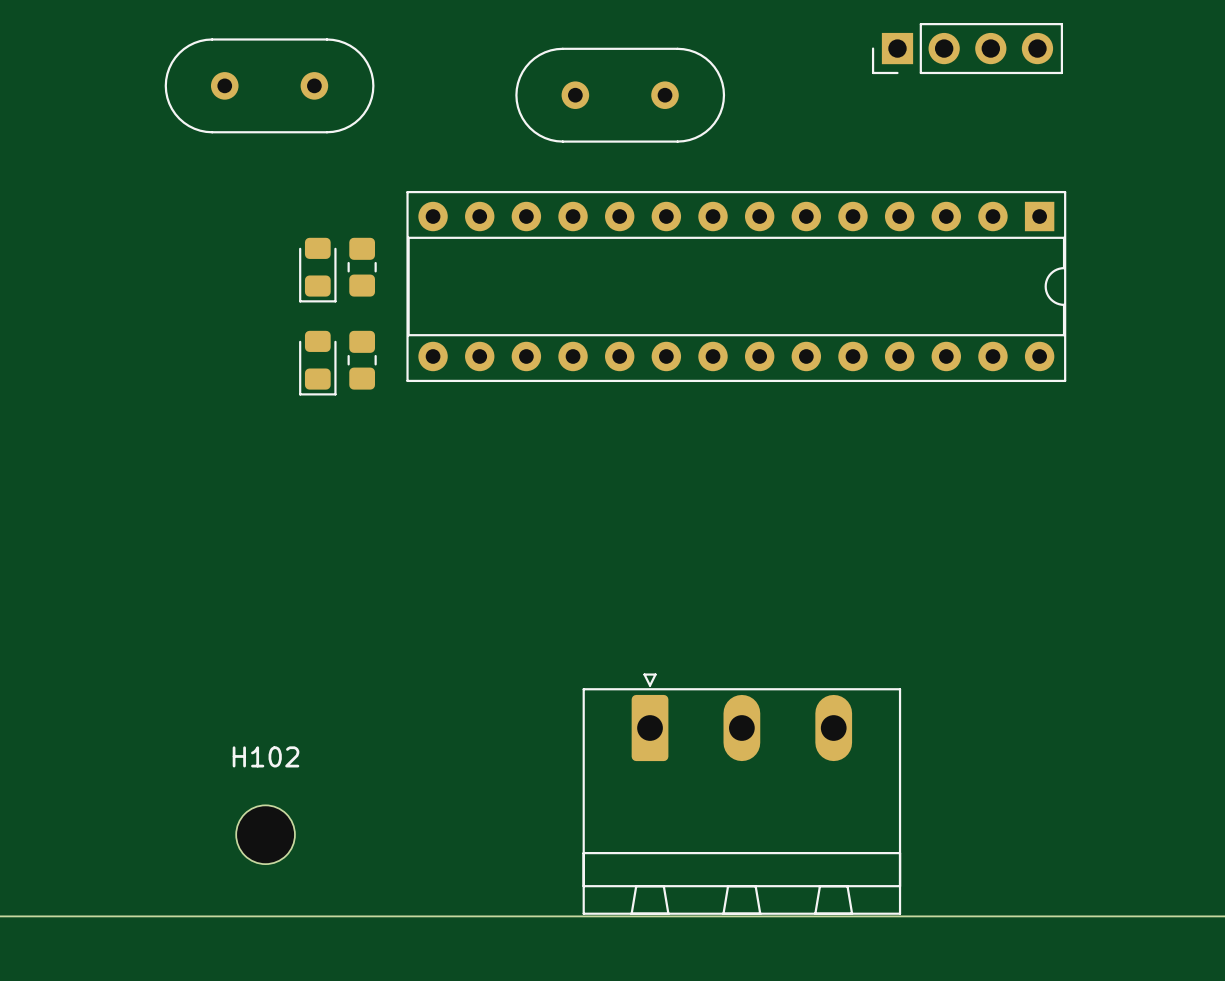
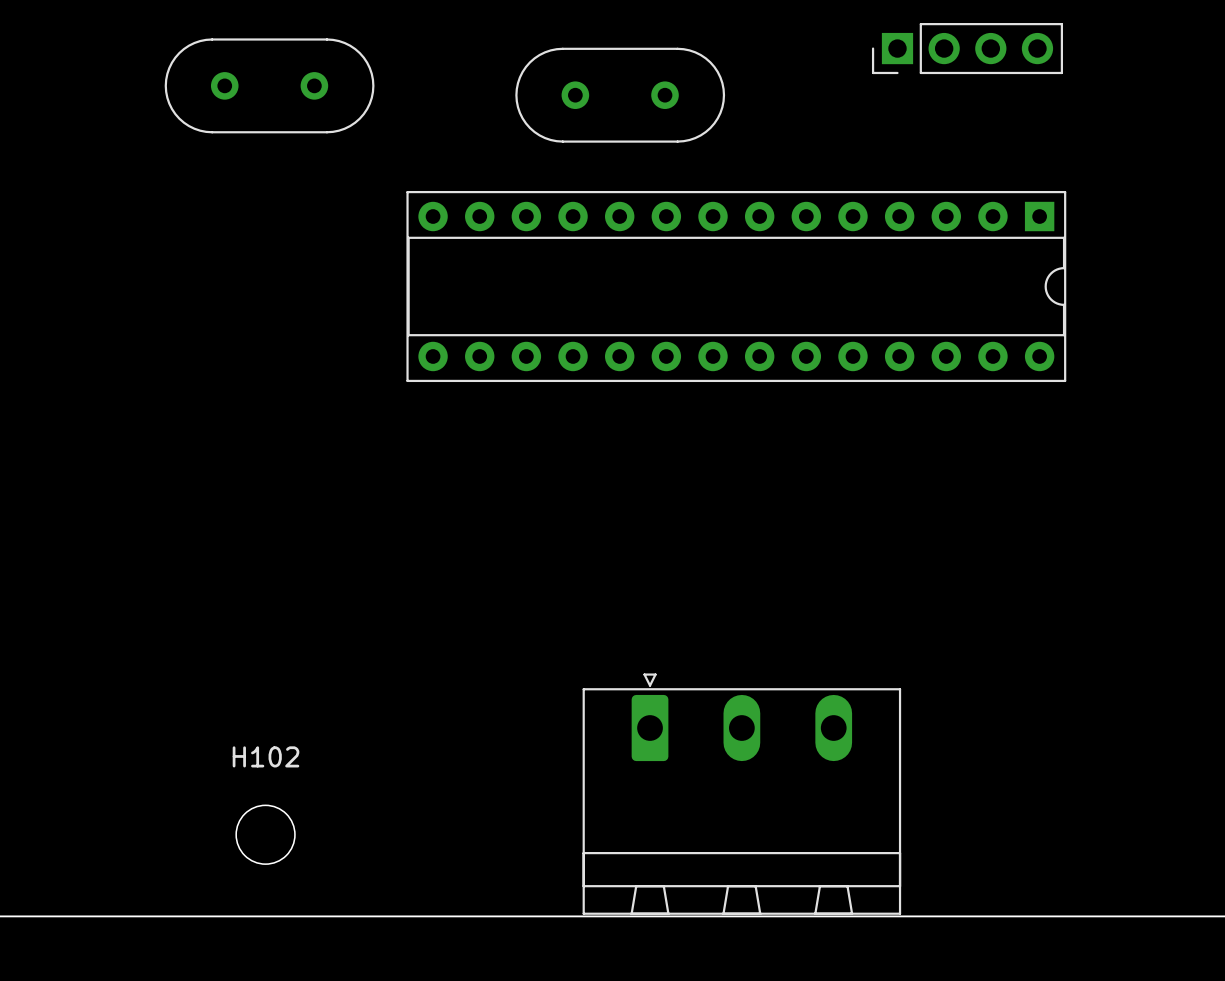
part: (362, 267) -> none
part: (317, 270) -> none
part: (362, 360) -> none
part: (317, 363) -> none

